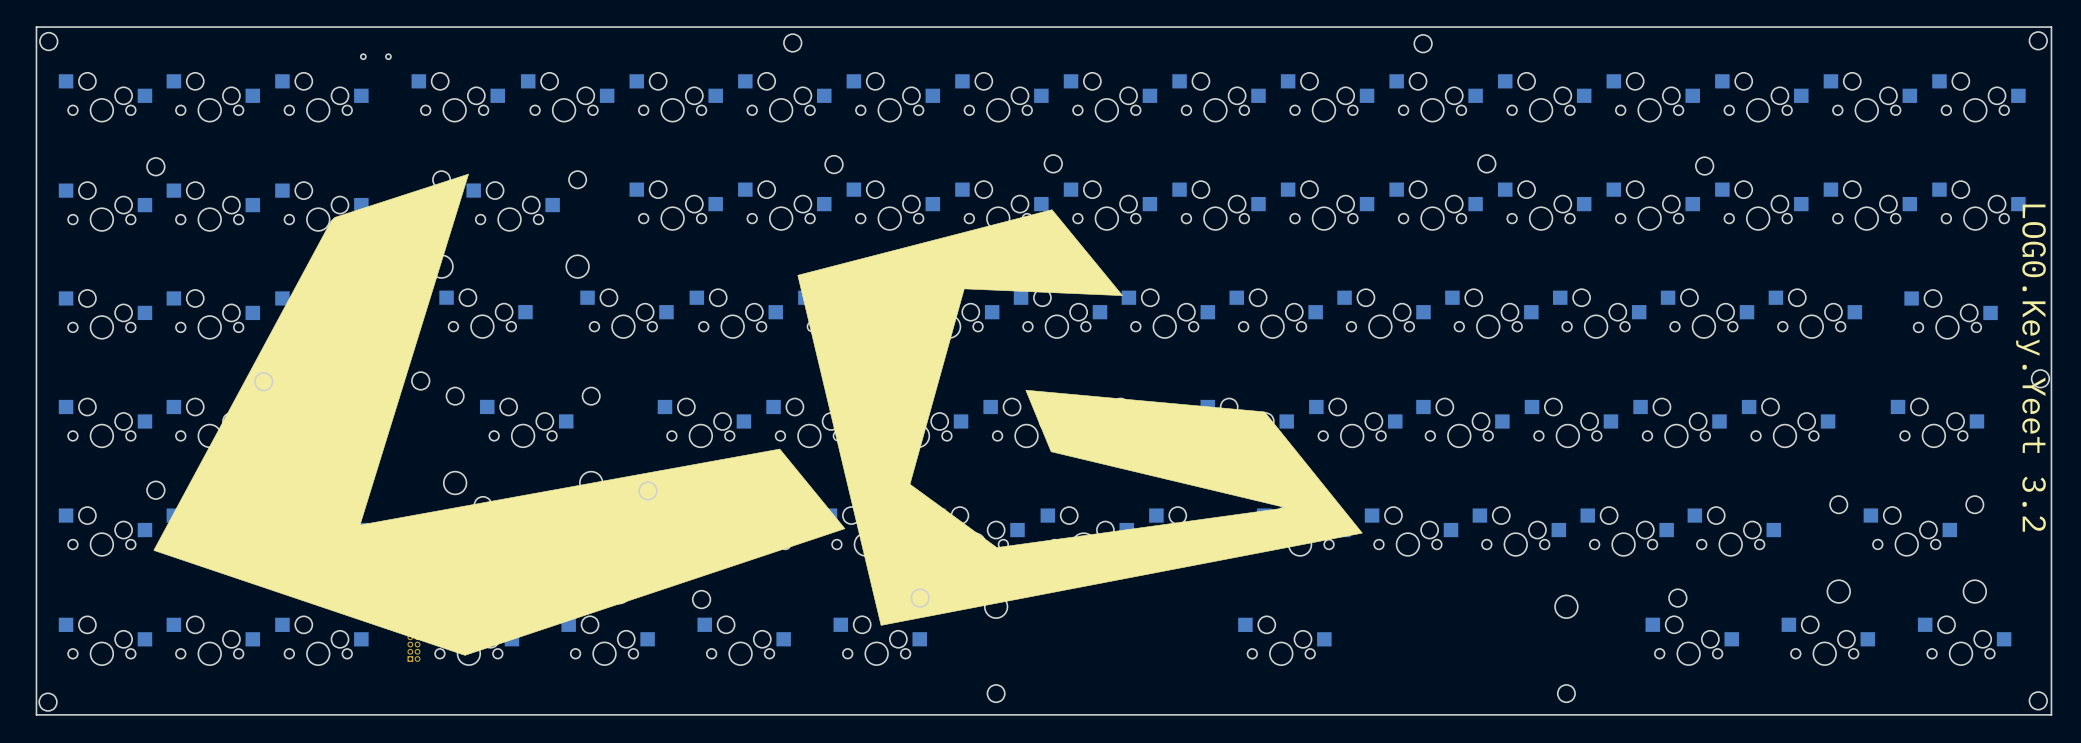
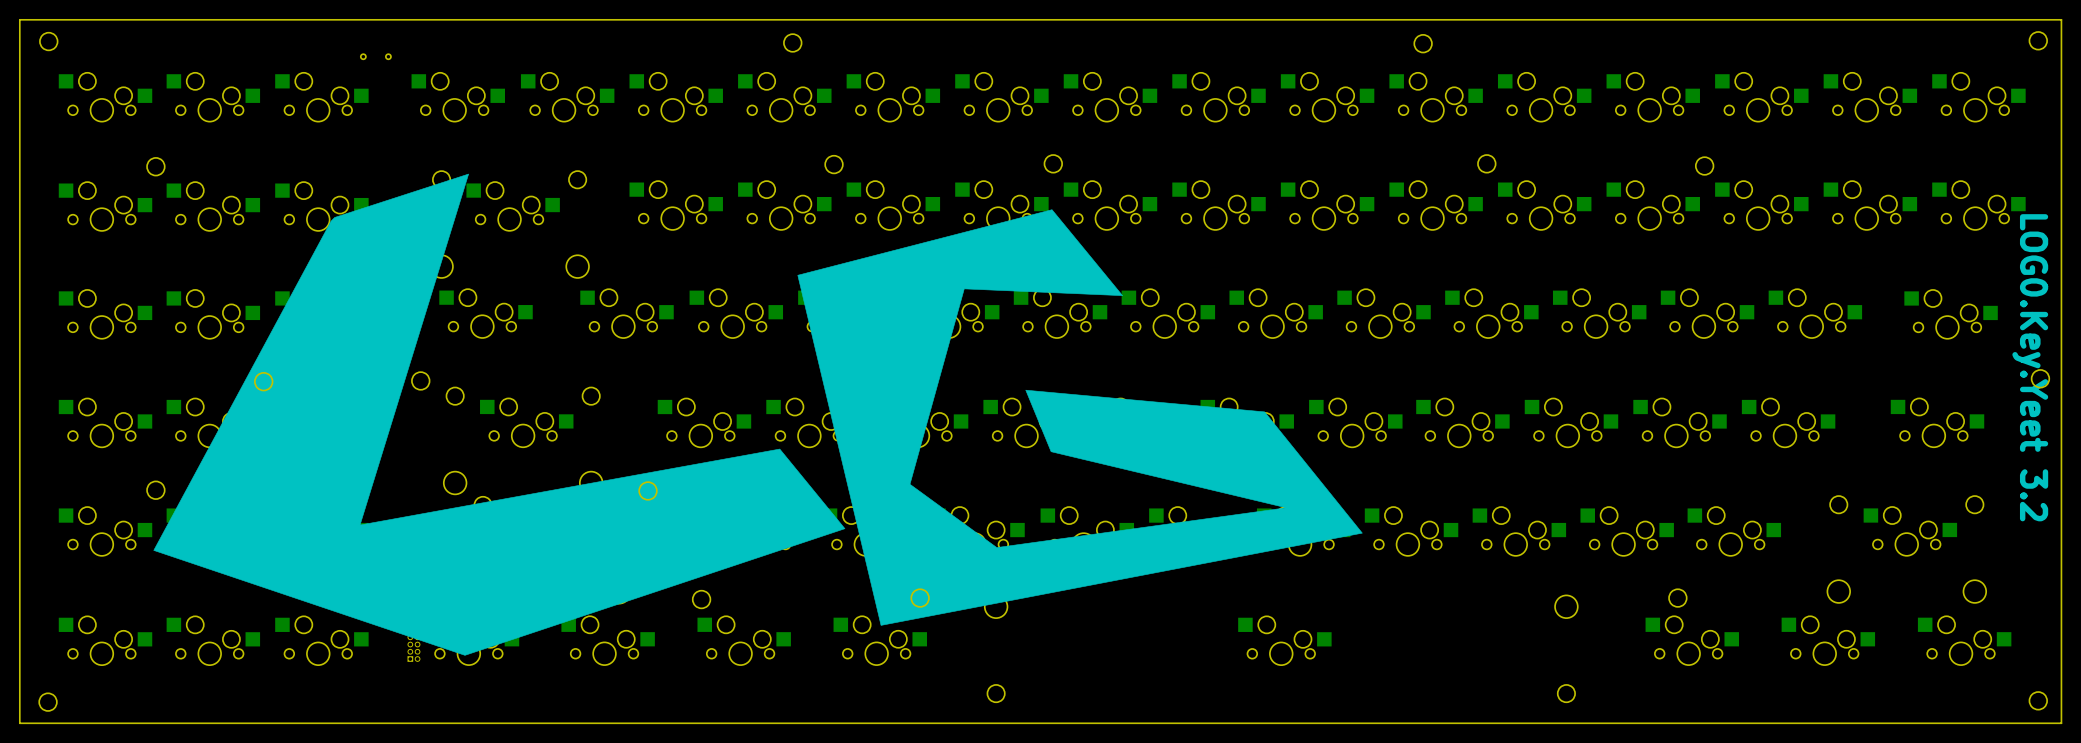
board edge: (2051, 27) (36, 27) (36, 714) (2051, 714) (2051, 27) -> (2061, 19) (2061, 723) (19, 723) (19, 19) (2061, 19)

